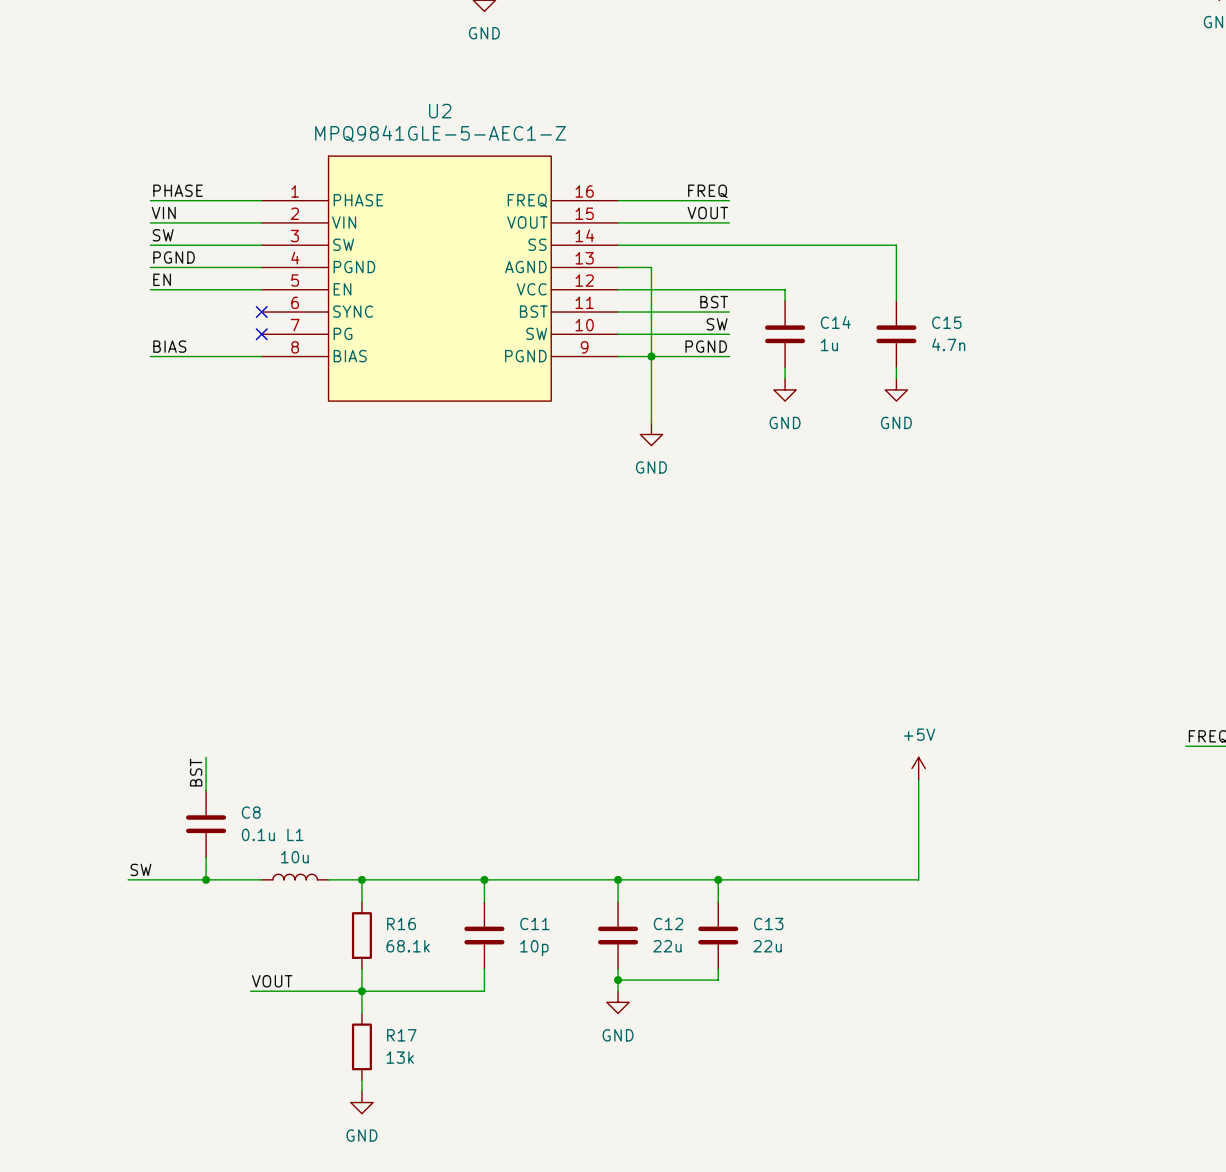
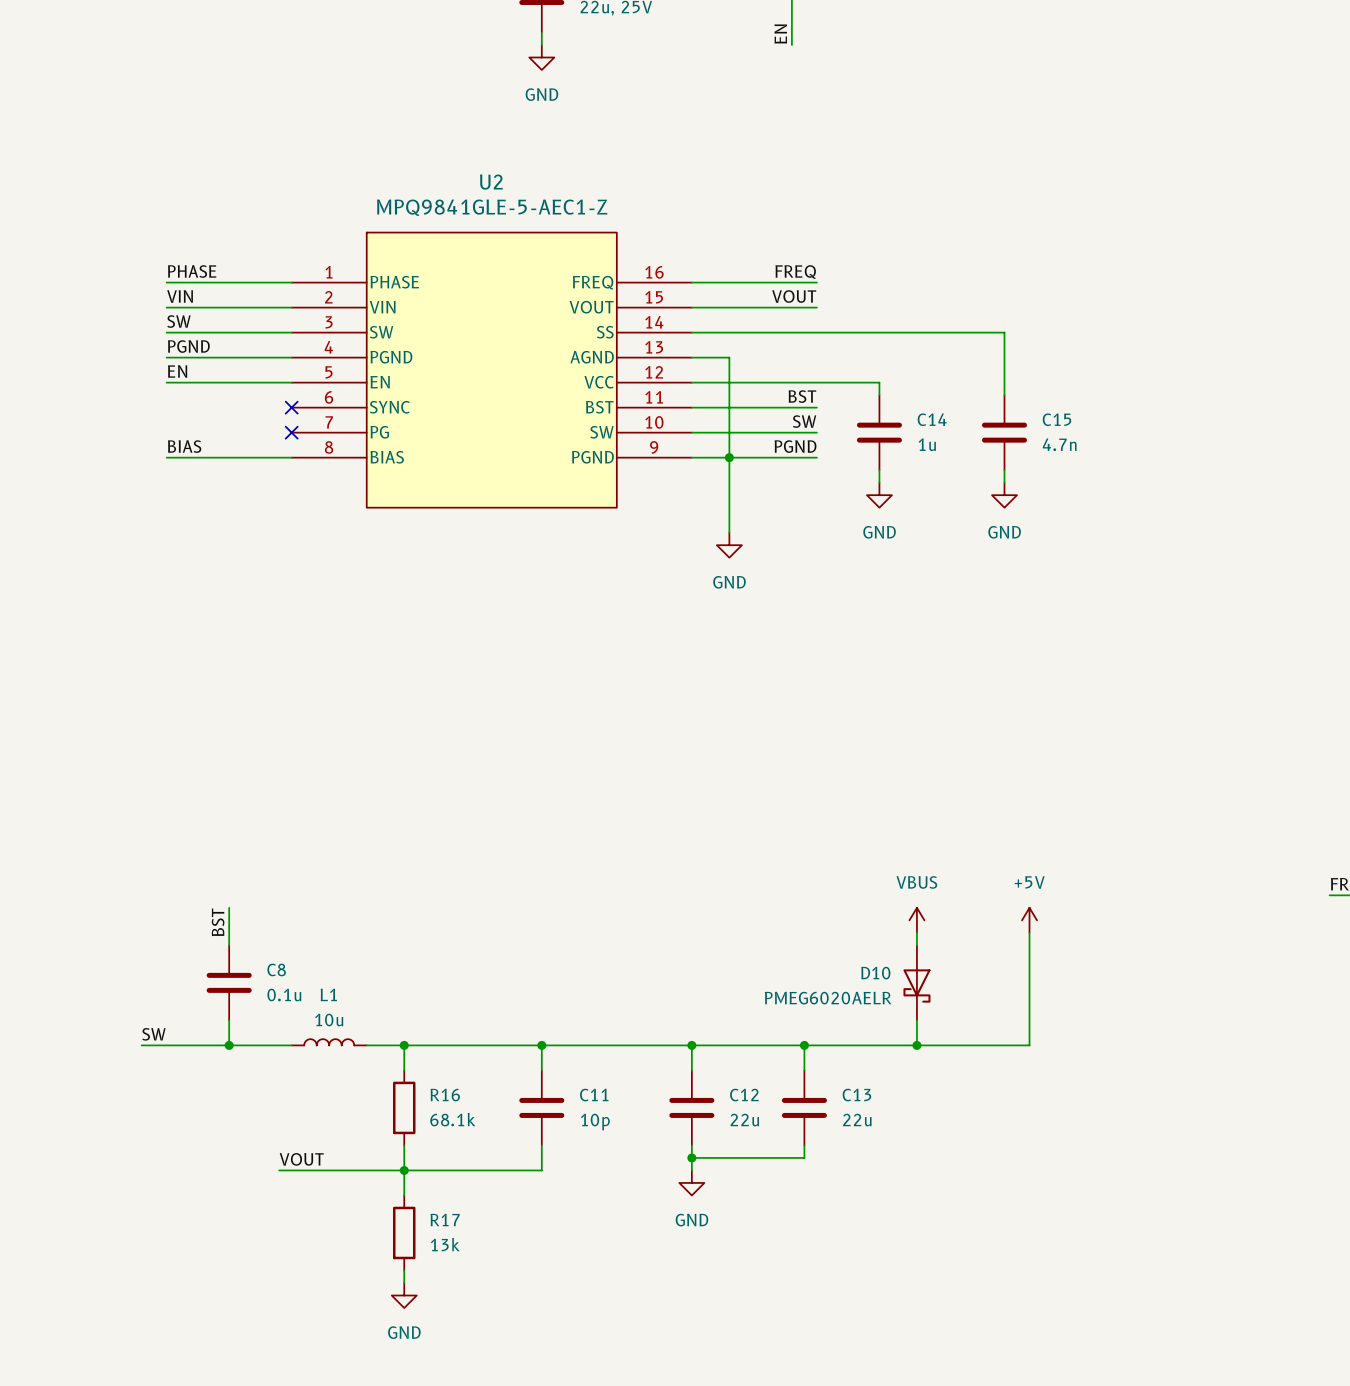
power symbol: none -> VBUS (916, 920)
wire: none -> (916, 932) (916, 945)
D10: none -> PMEG6020AELR (916, 982)
wire: none -> (916, 1020) (916, 1045)
junction: none -> (916, 1045)

